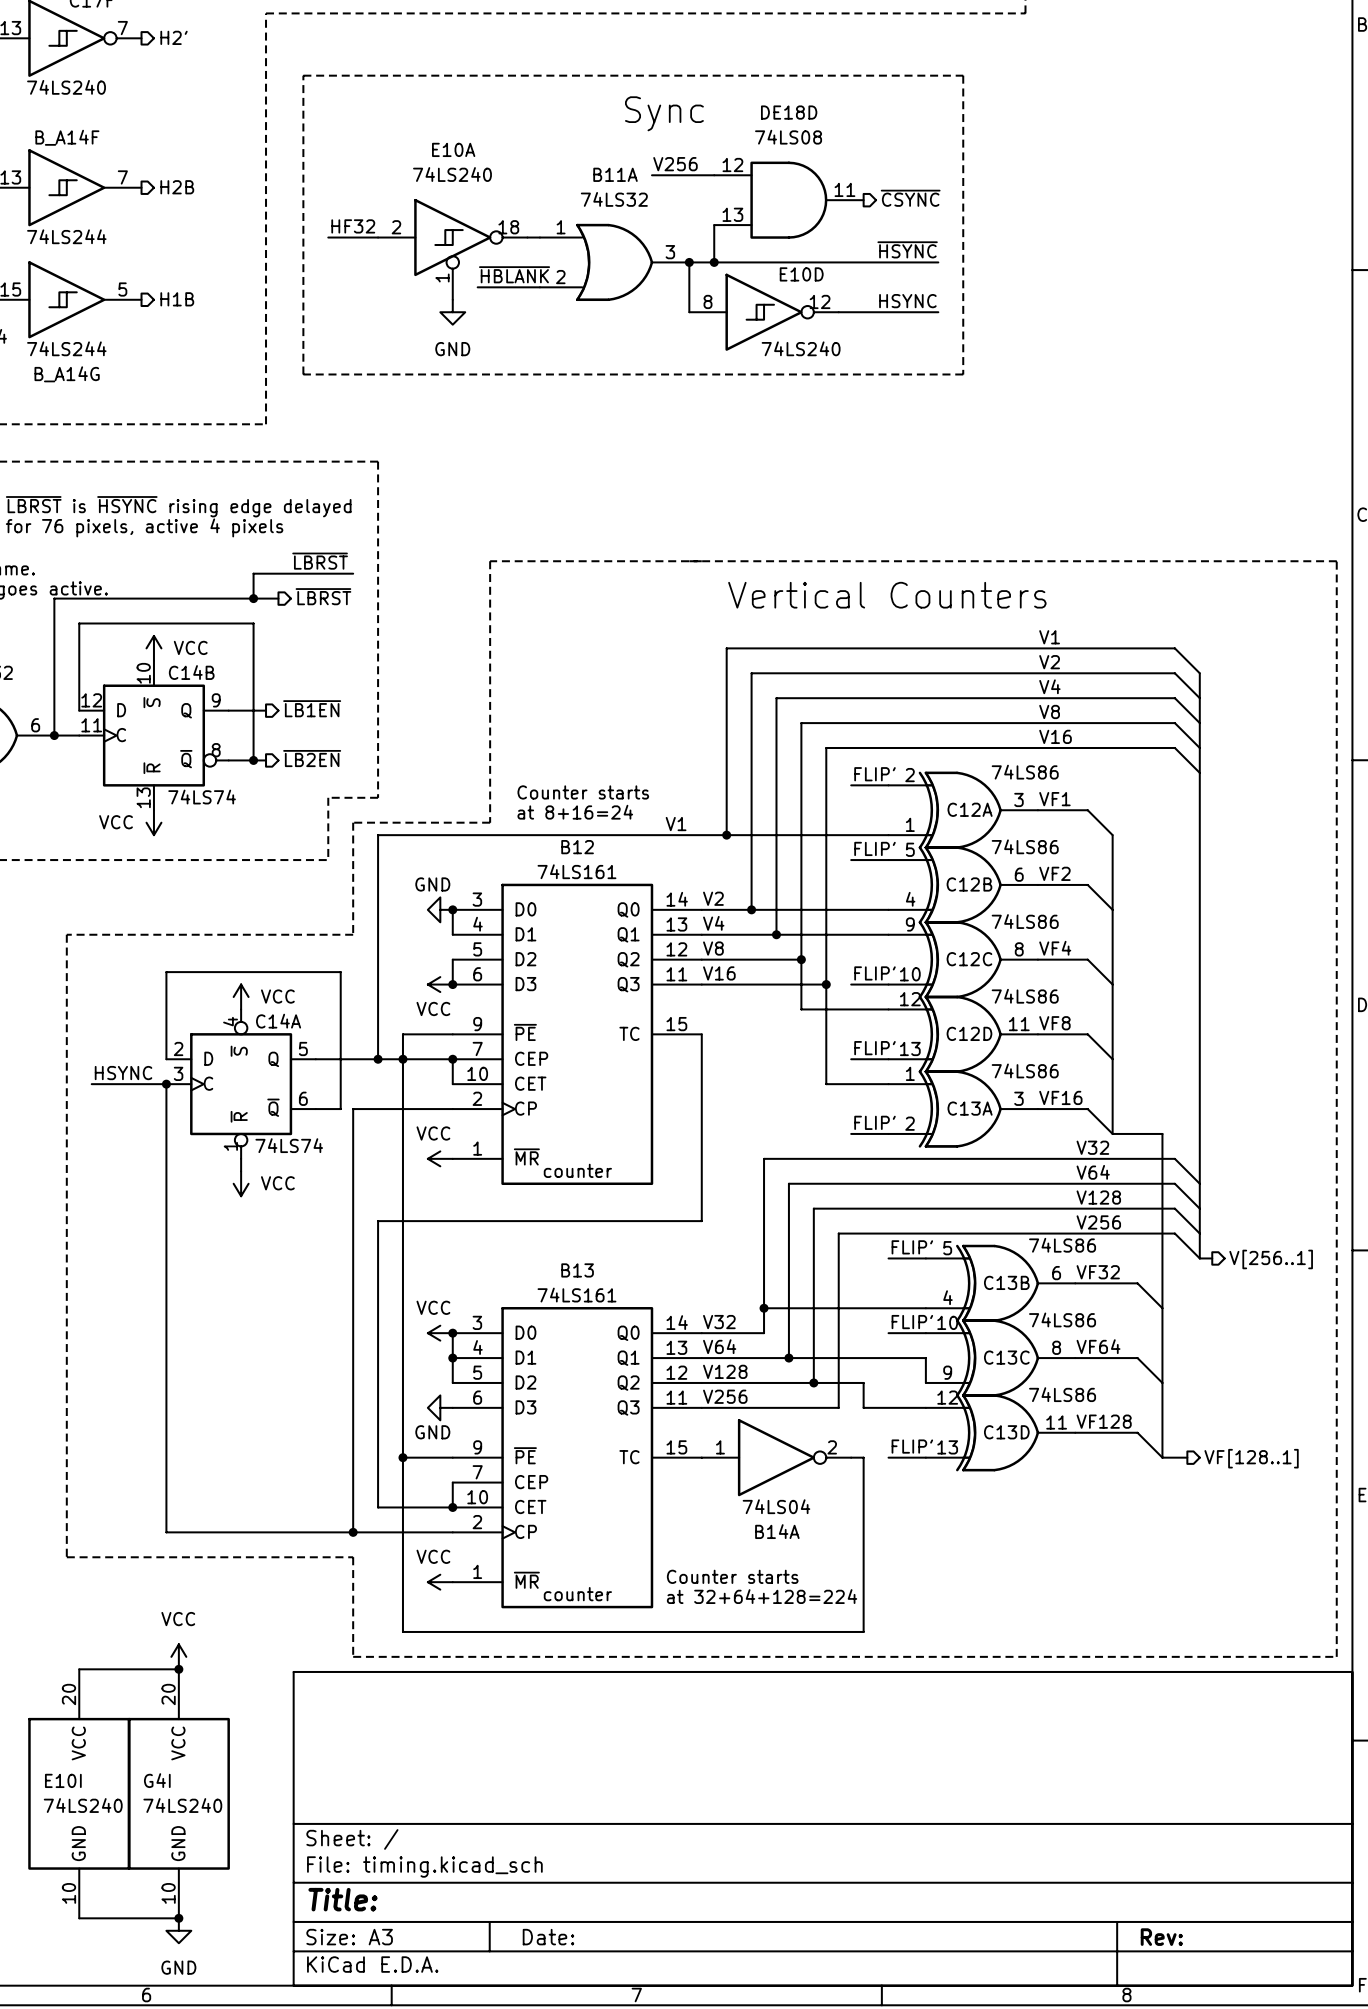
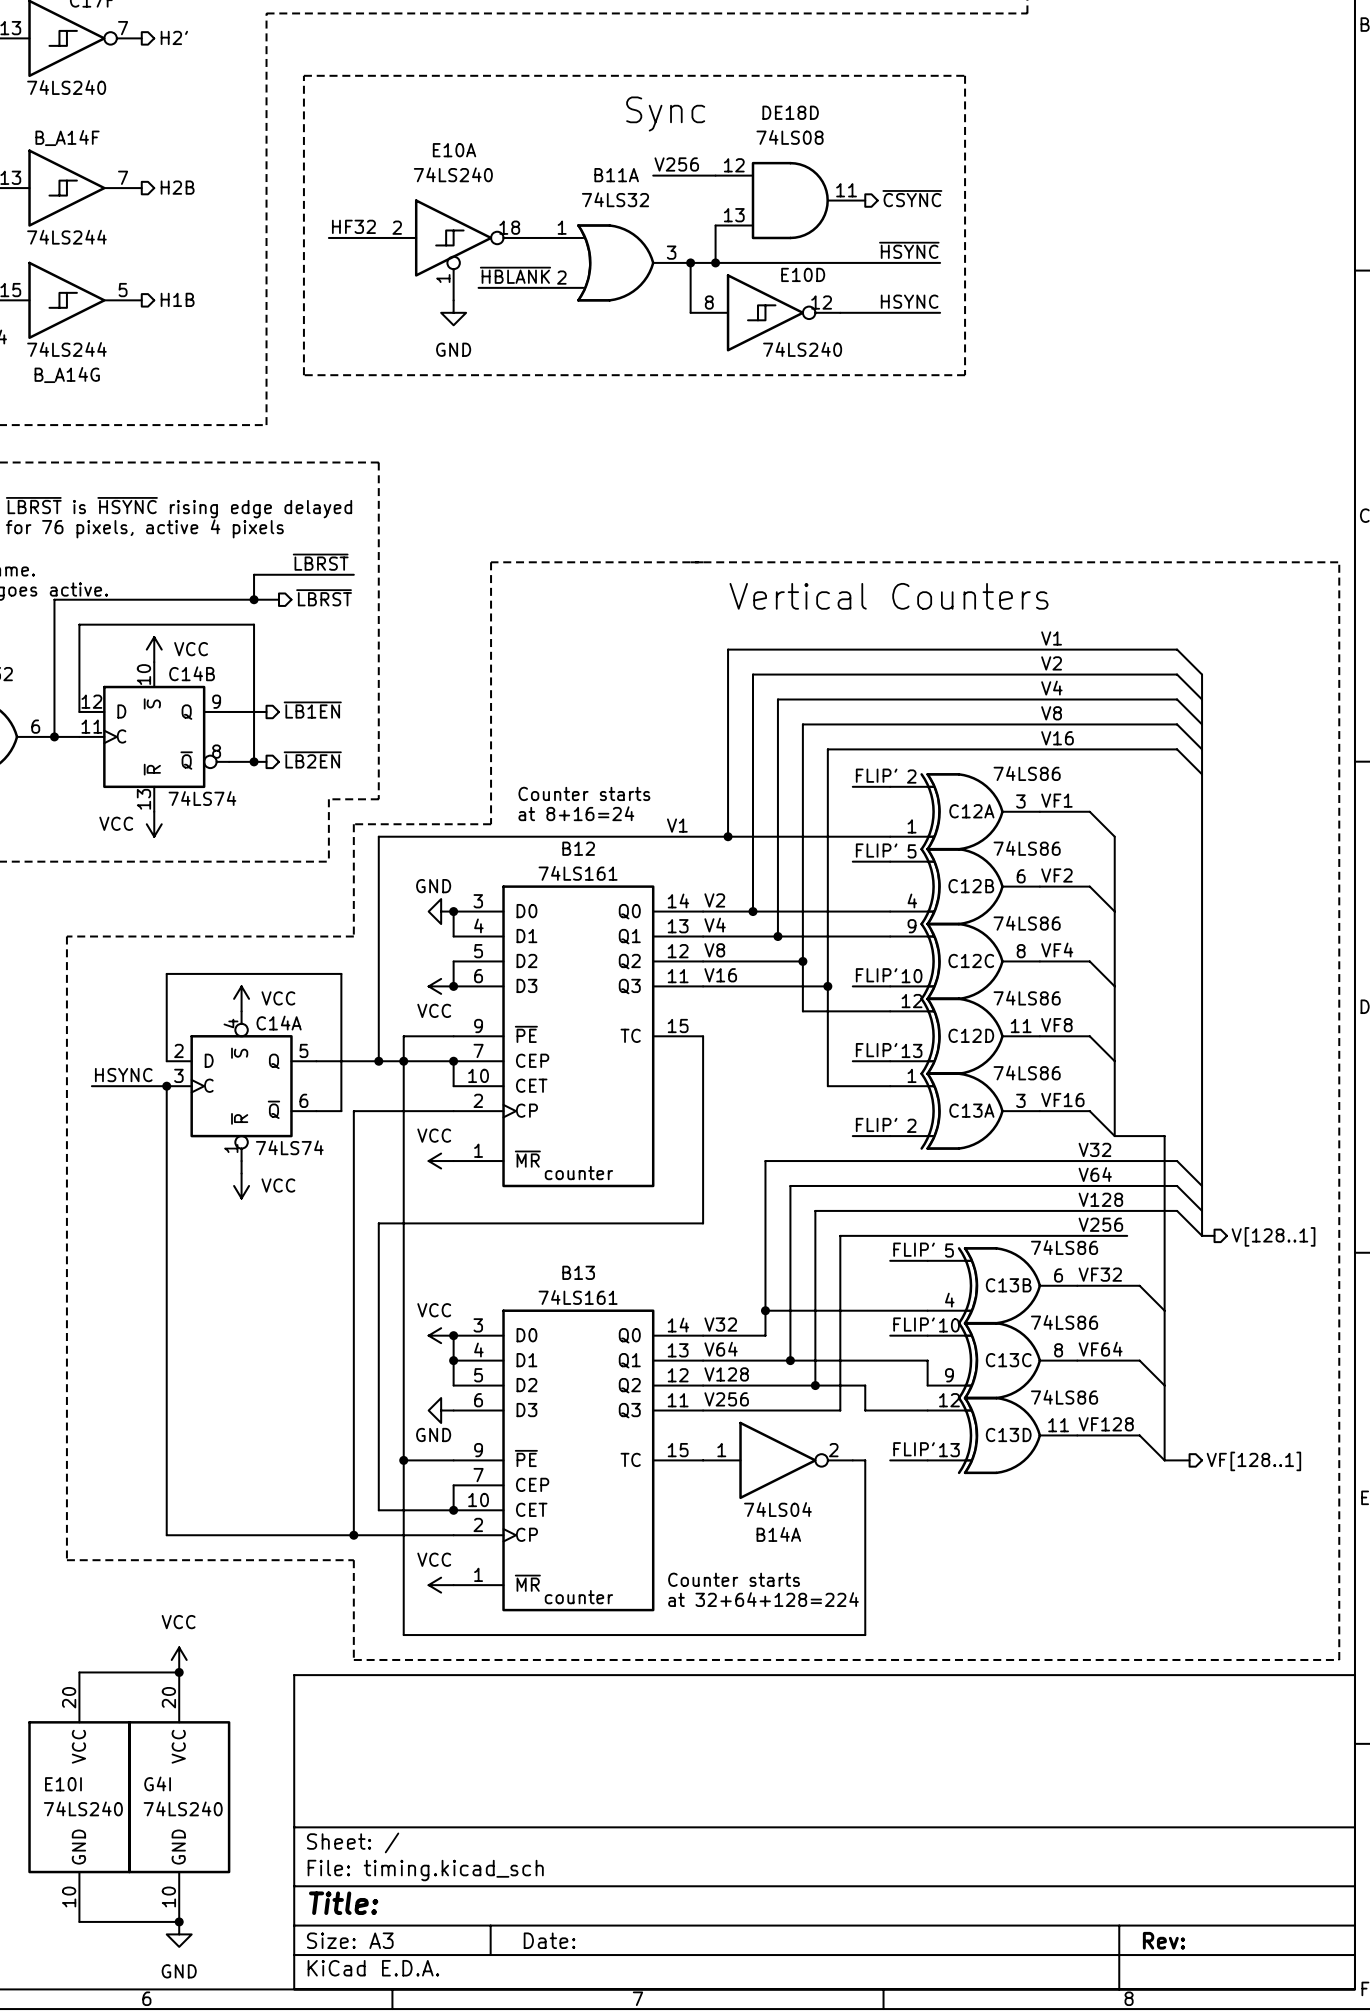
wire: (1125, 1233) (1174, 1233) (1199, 1258) -> none
bus: (1199, 1233) (1199, 1258) (1212, 1258) -> (1202, 1235) (1214, 1235)
hierarchical label: V[256..1] (1271, 1259) -> V[128..1] (1273, 1236)

